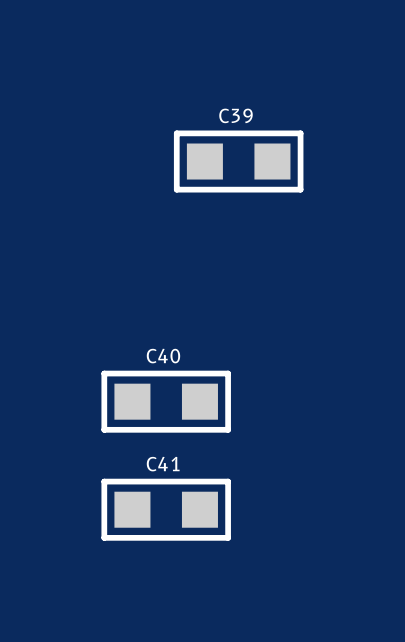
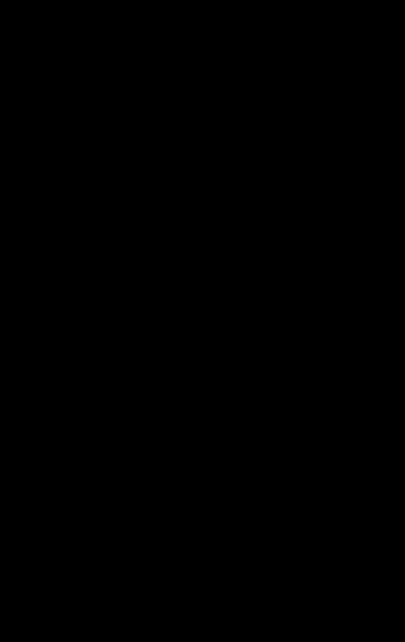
C39: (238, 161) -> none
C40: (166, 401) -> none
C41: (166, 509) -> none

